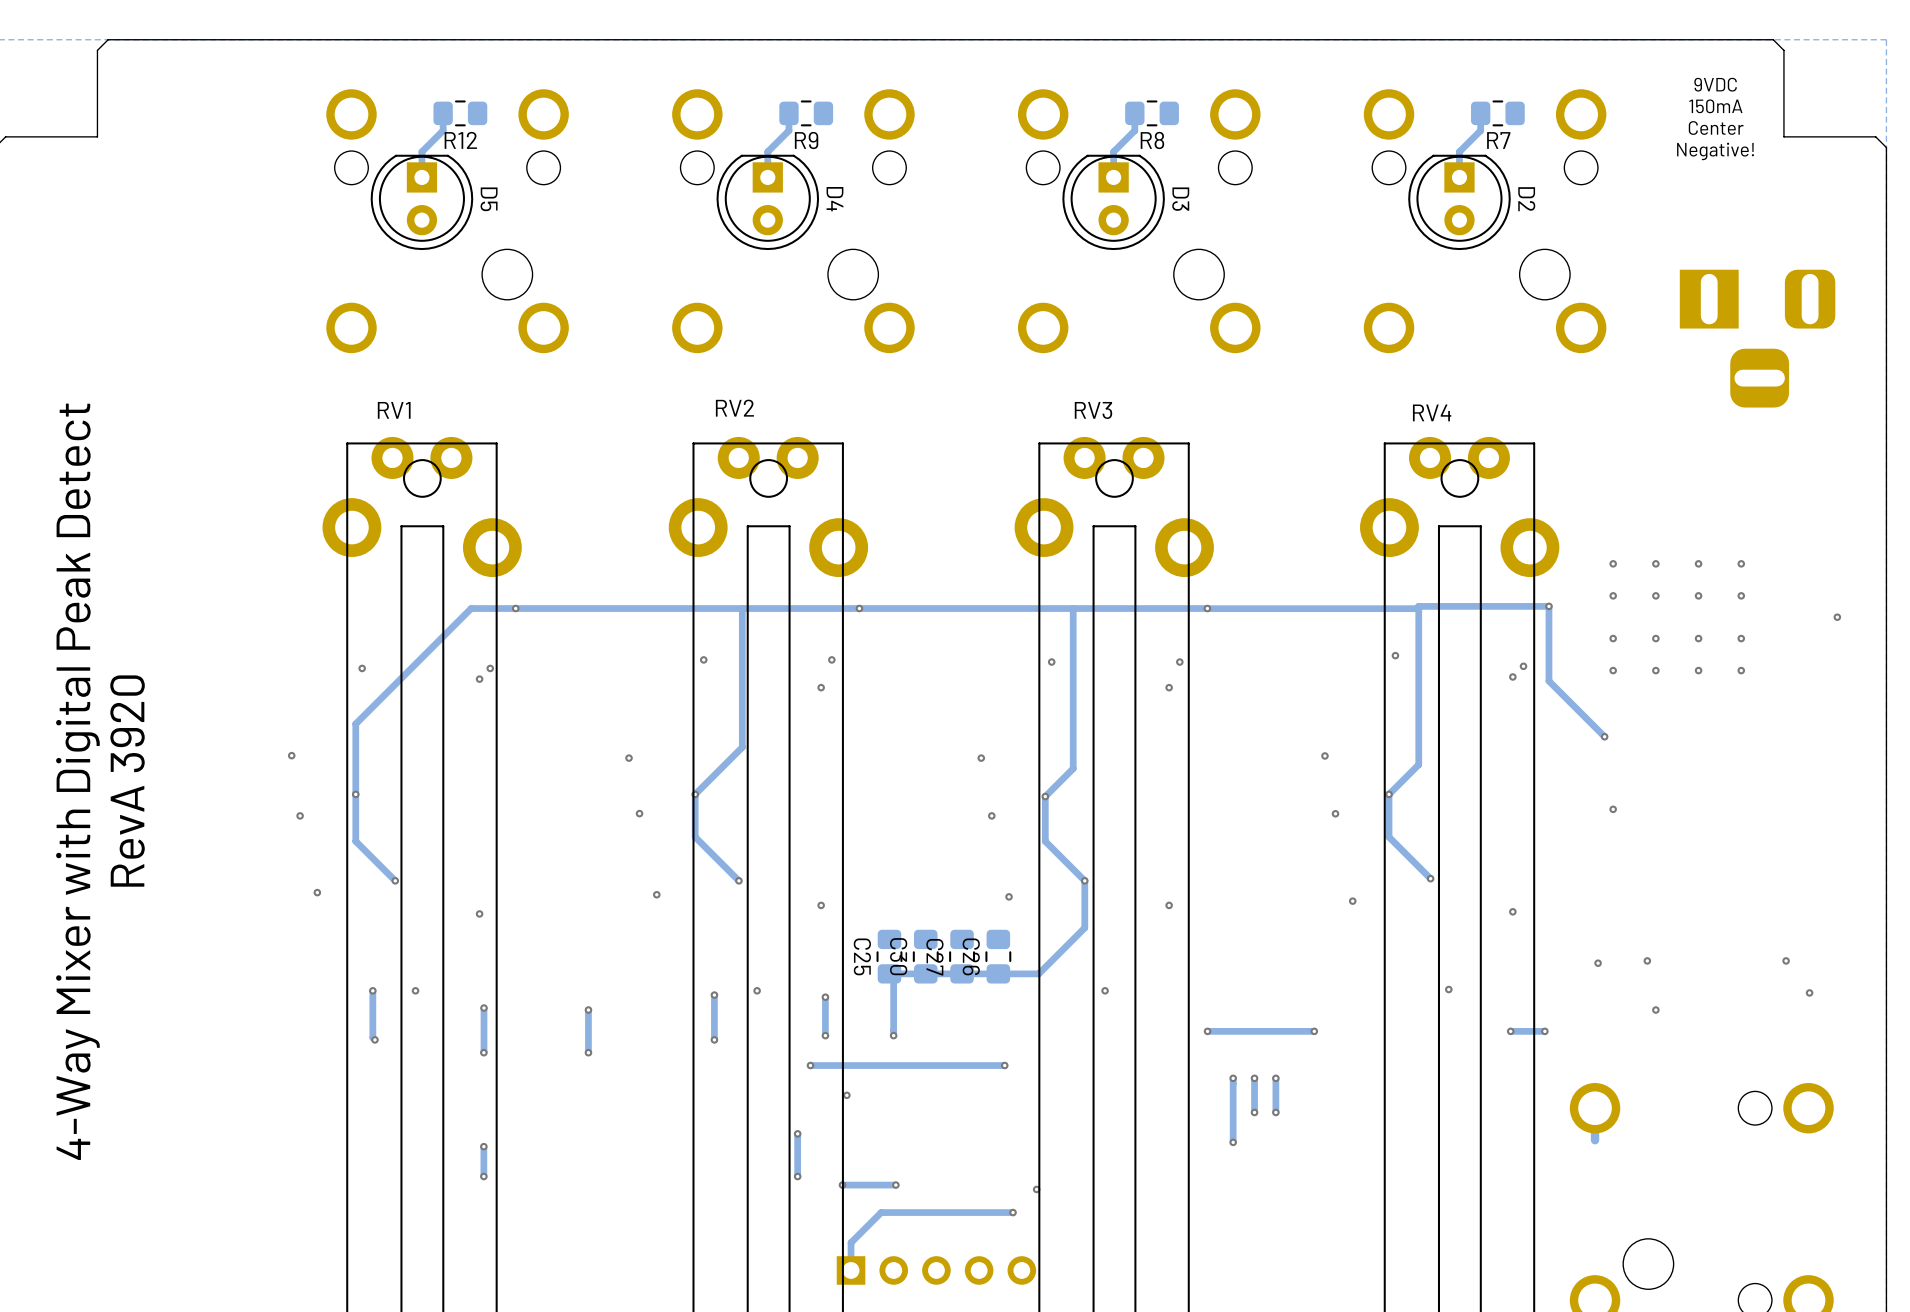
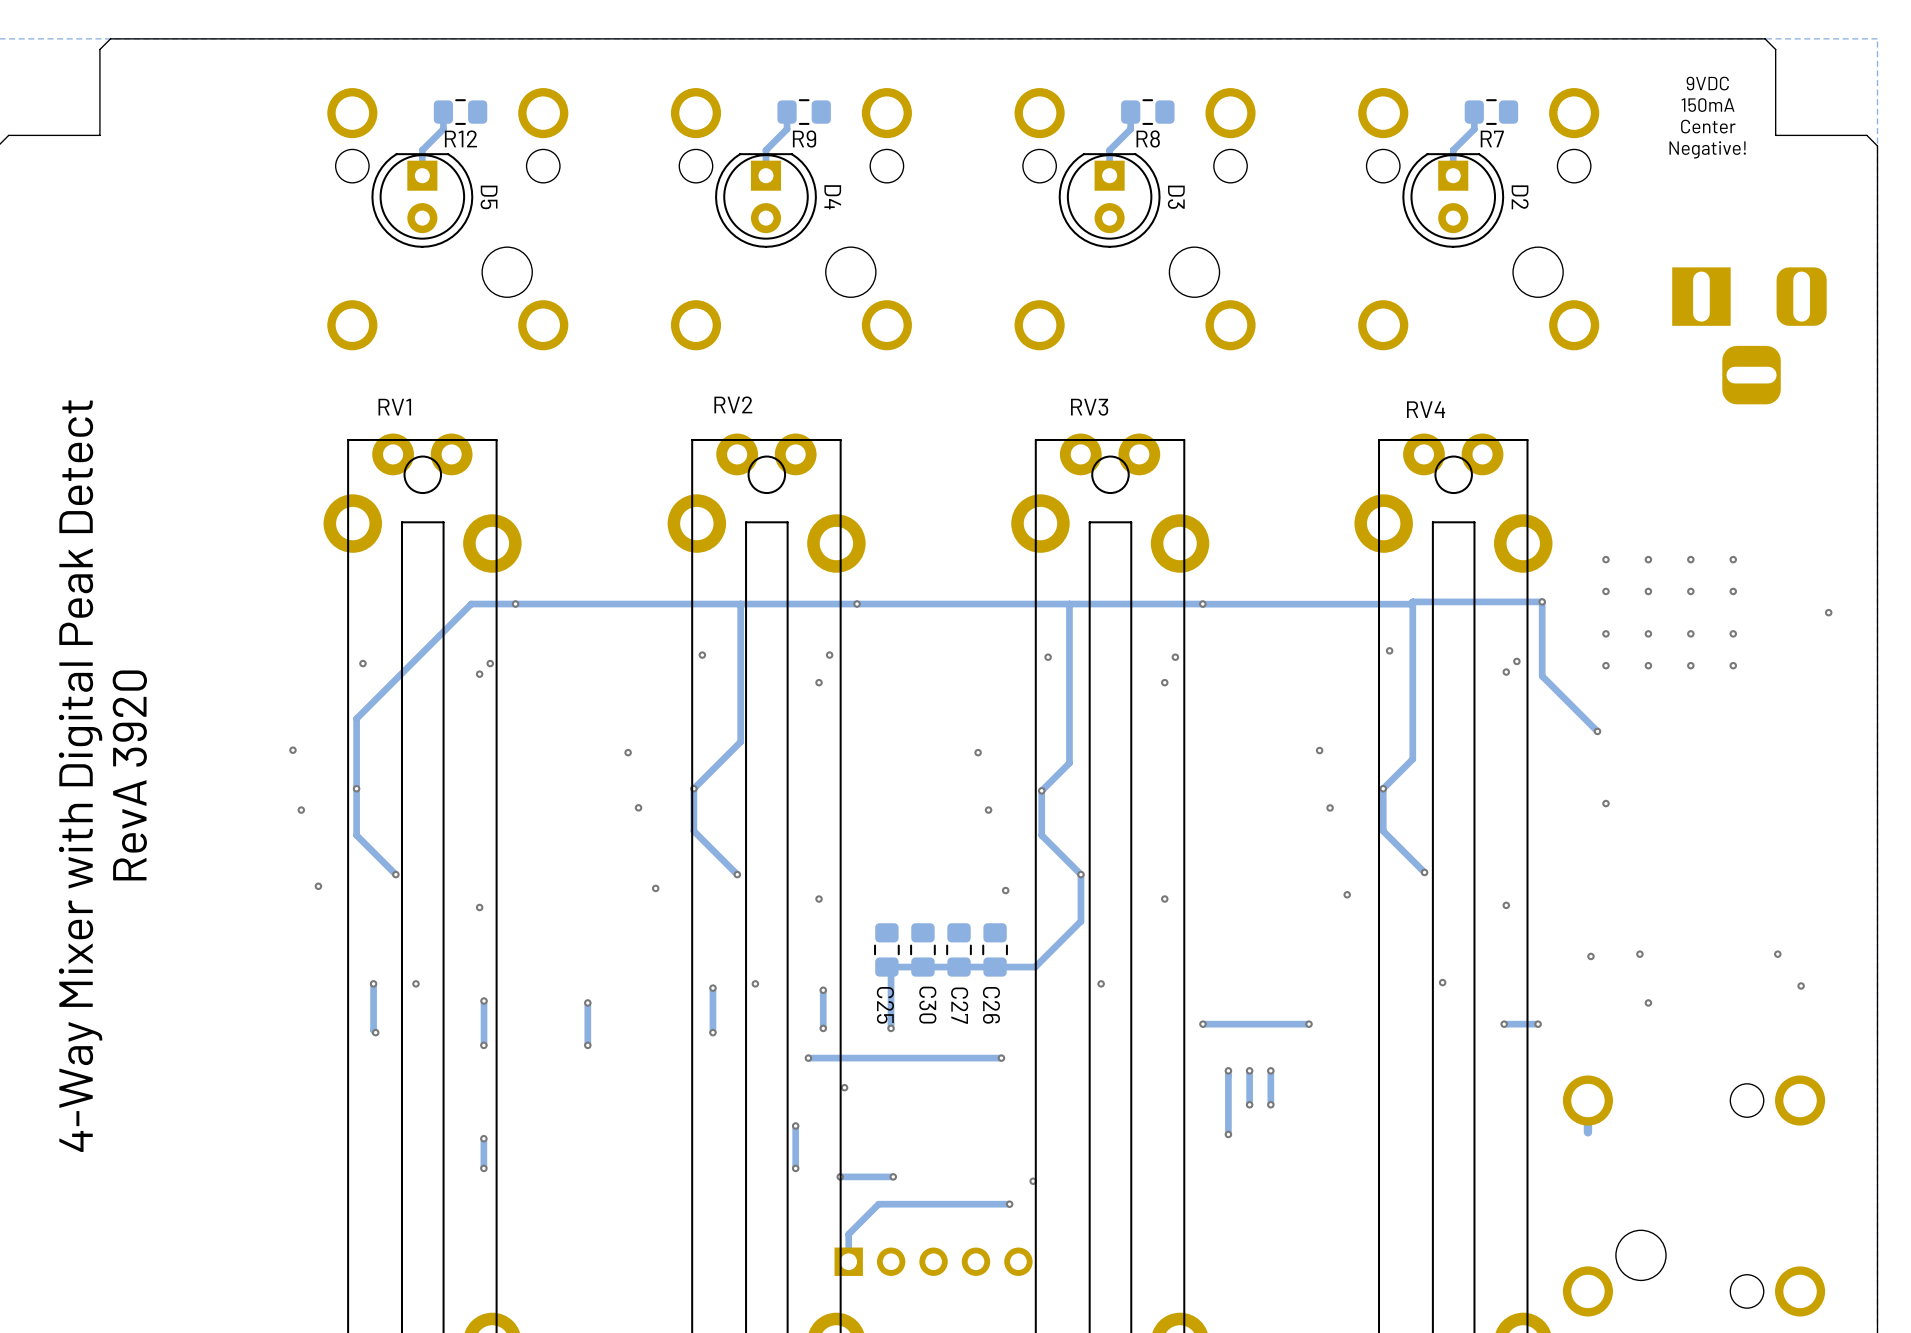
C25 name position: C25 (862, 956) -> C25 (885, 1005)
C30 name position: C30 (898, 956) -> C30 (927, 1005)
C26 name position: C26 (971, 956) -> C26 (991, 1005)
C27 name position: C27 (934, 957) -> C27 (959, 1005)

